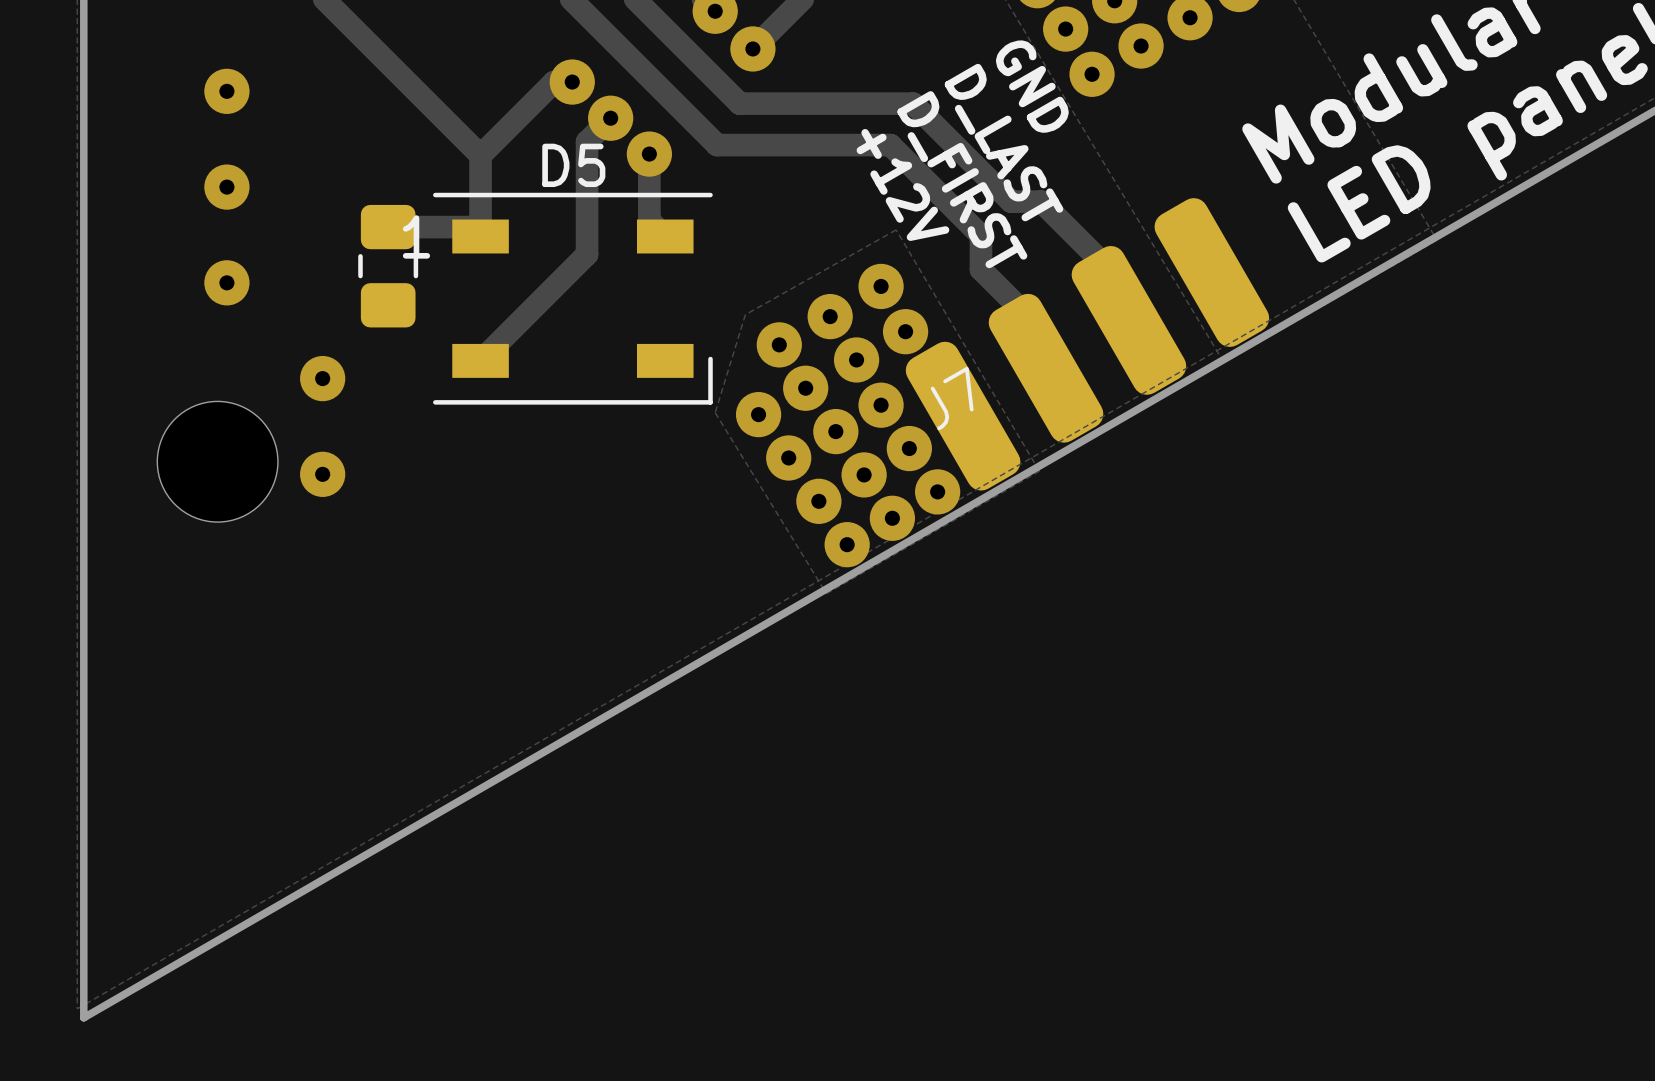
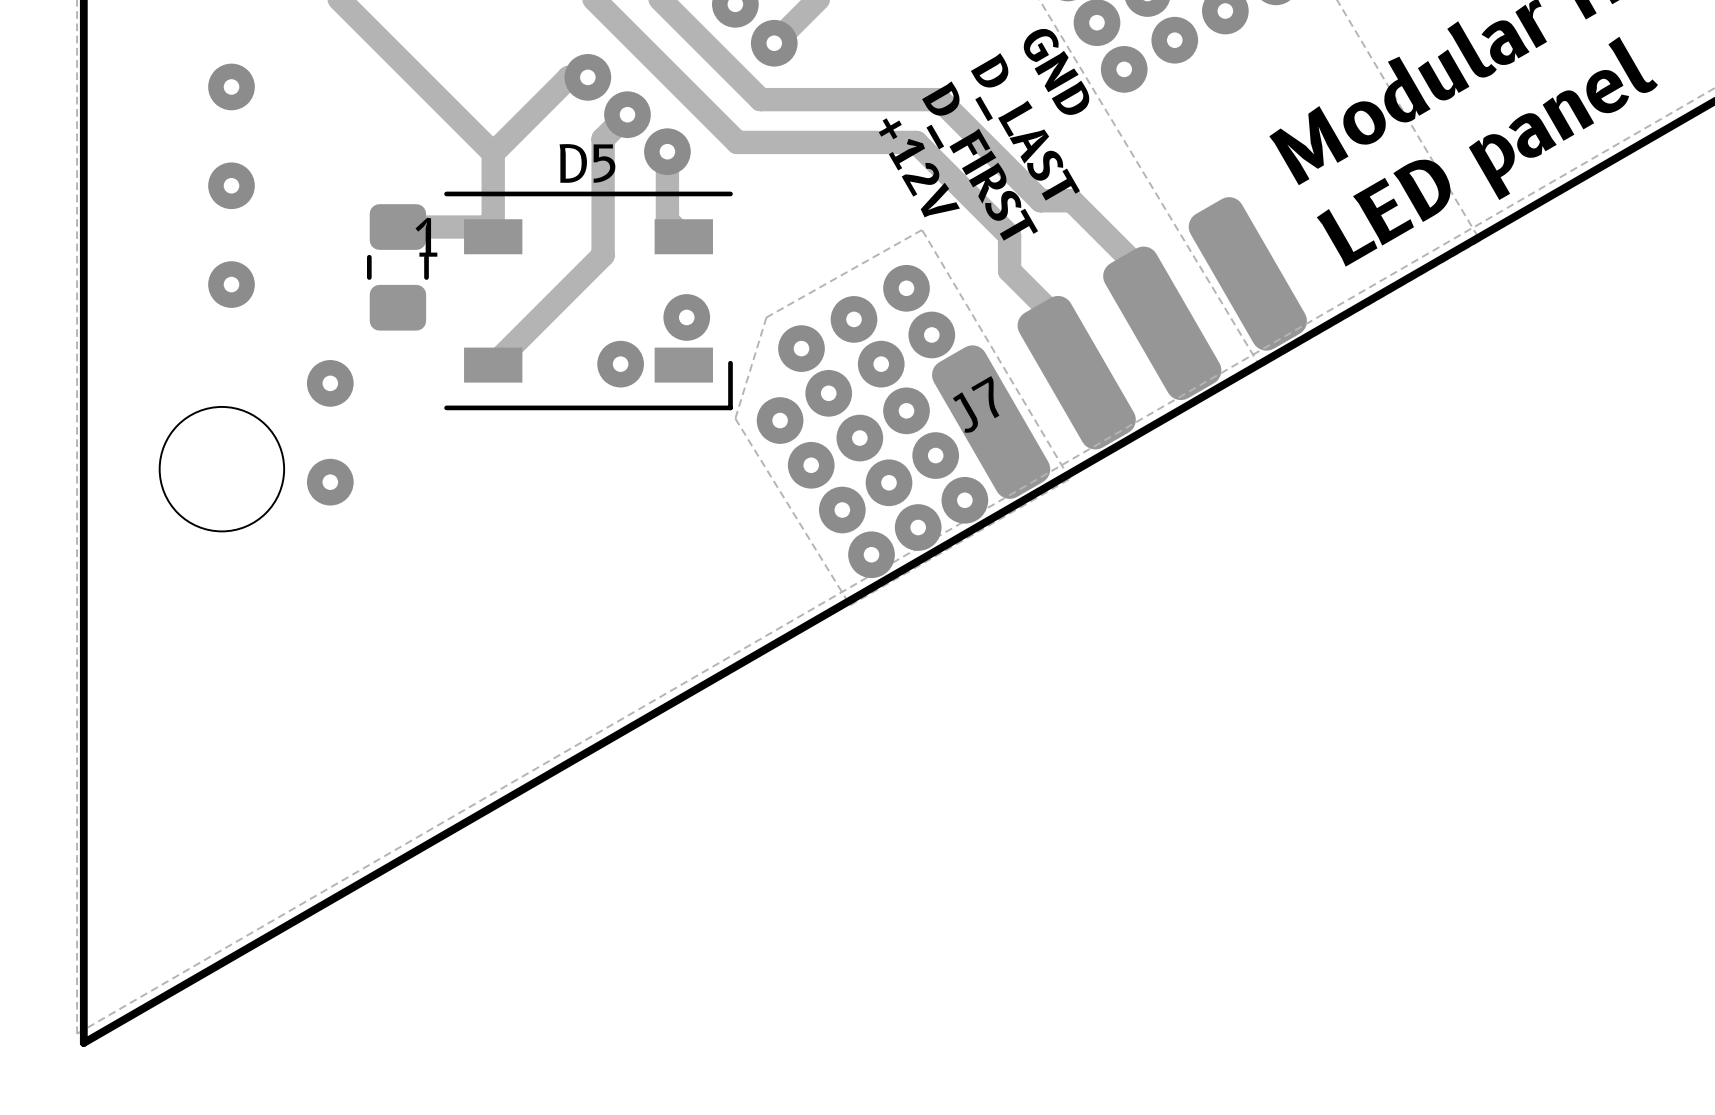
via: none -> (686, 317)
via: none -> (620, 364)

